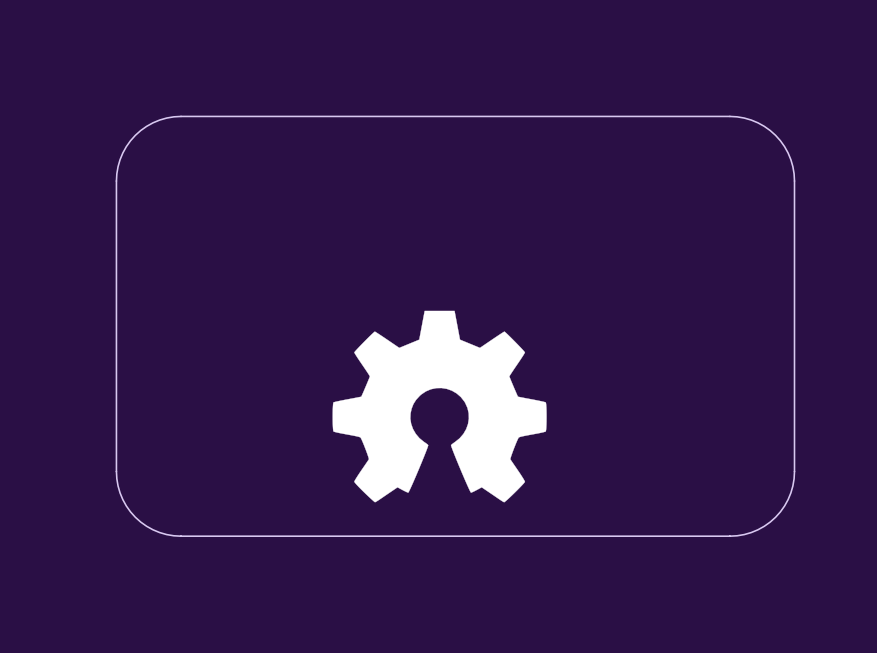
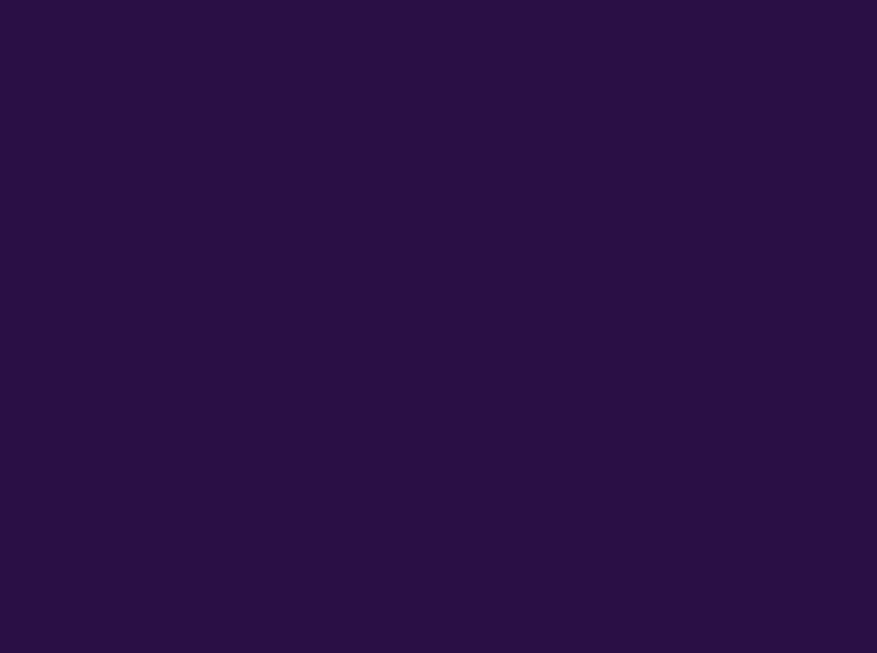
board edge: (181, 116) (729, 116) (744, 118) (764, 126) (775, 135) (784, 146) (790, 159) (794, 181) (794, 471) (790, 492) (784, 505) (775, 517) (757, 529) (744, 534) (729, 536) (181, 536) (159, 532) (146, 526) (135, 517) (126, 505) (120, 492) (116, 478) (116, 173) (122, 152) (135, 135) (152, 122) (166, 118) (181, 116) -> none
drawing: [332, 310, 547, 503] -> none

